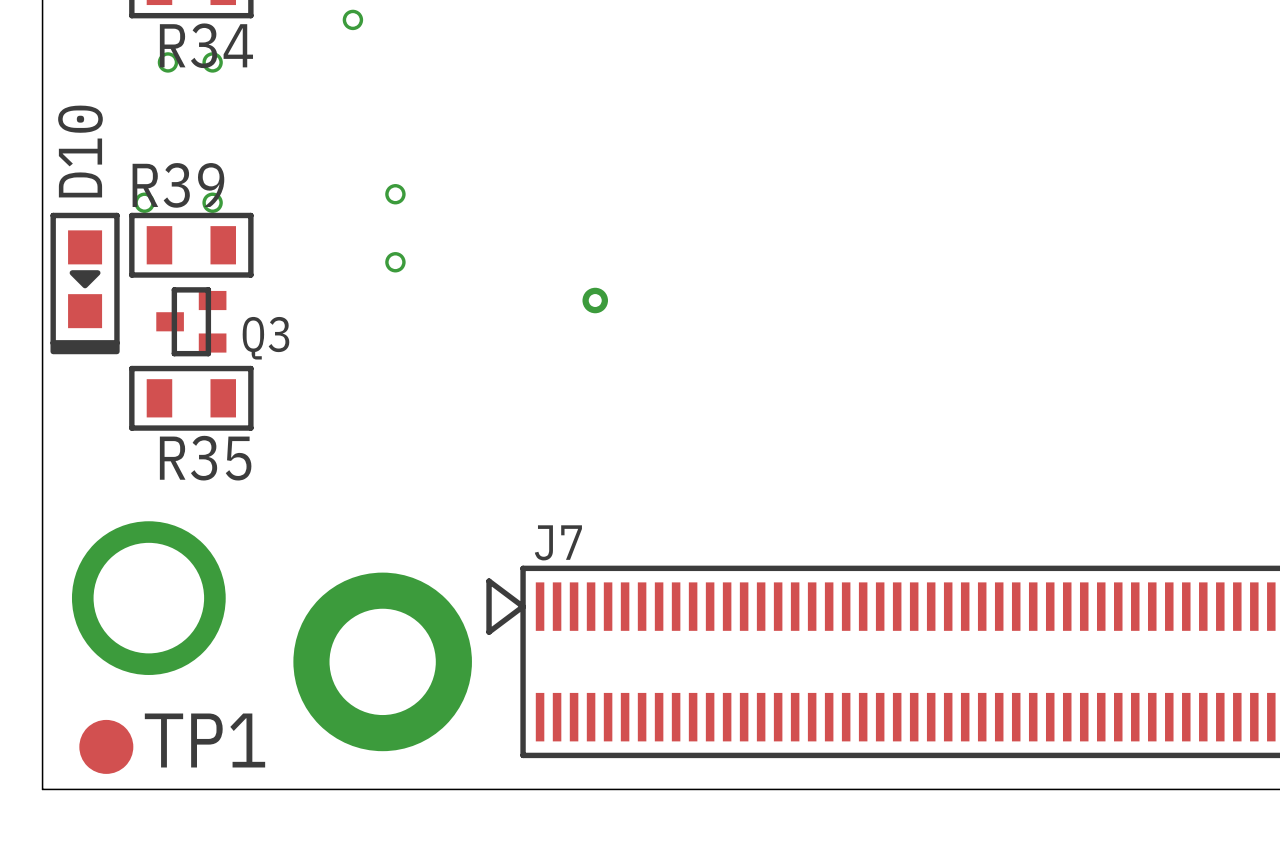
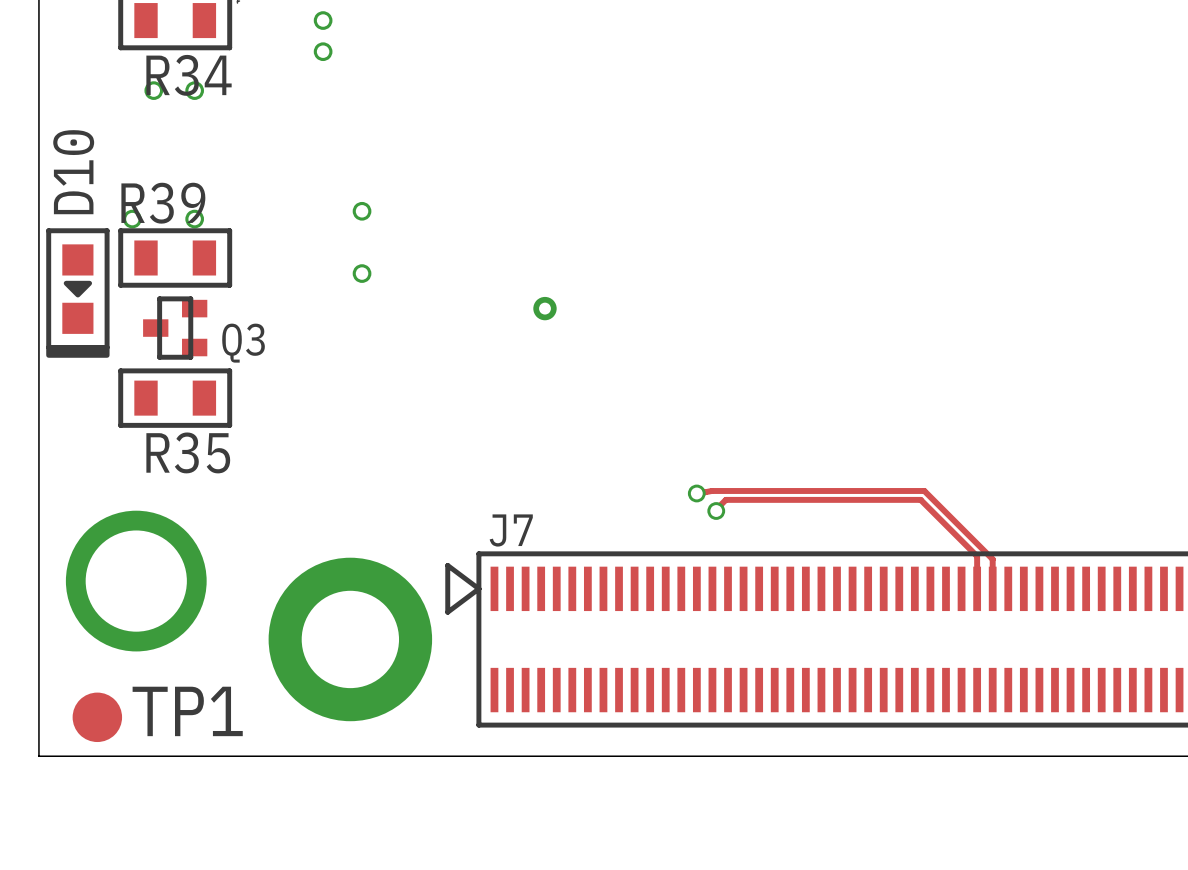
track: none -> (696, 493) (711, 490) (924, 490) (992, 559) (992, 588)
via: none -> (696, 493)
track: none -> (716, 508) (725, 499) (920, 499) (977, 556) (977, 588)
via: none -> (716, 511)

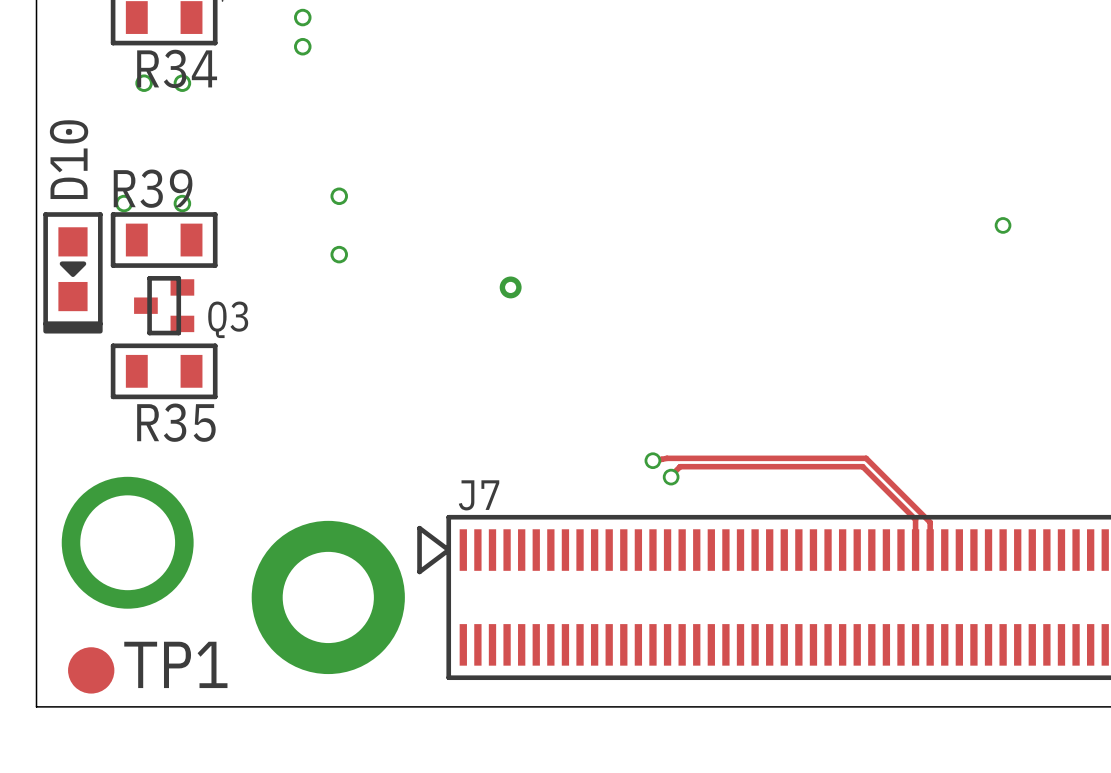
via: none -> (1003, 225)

